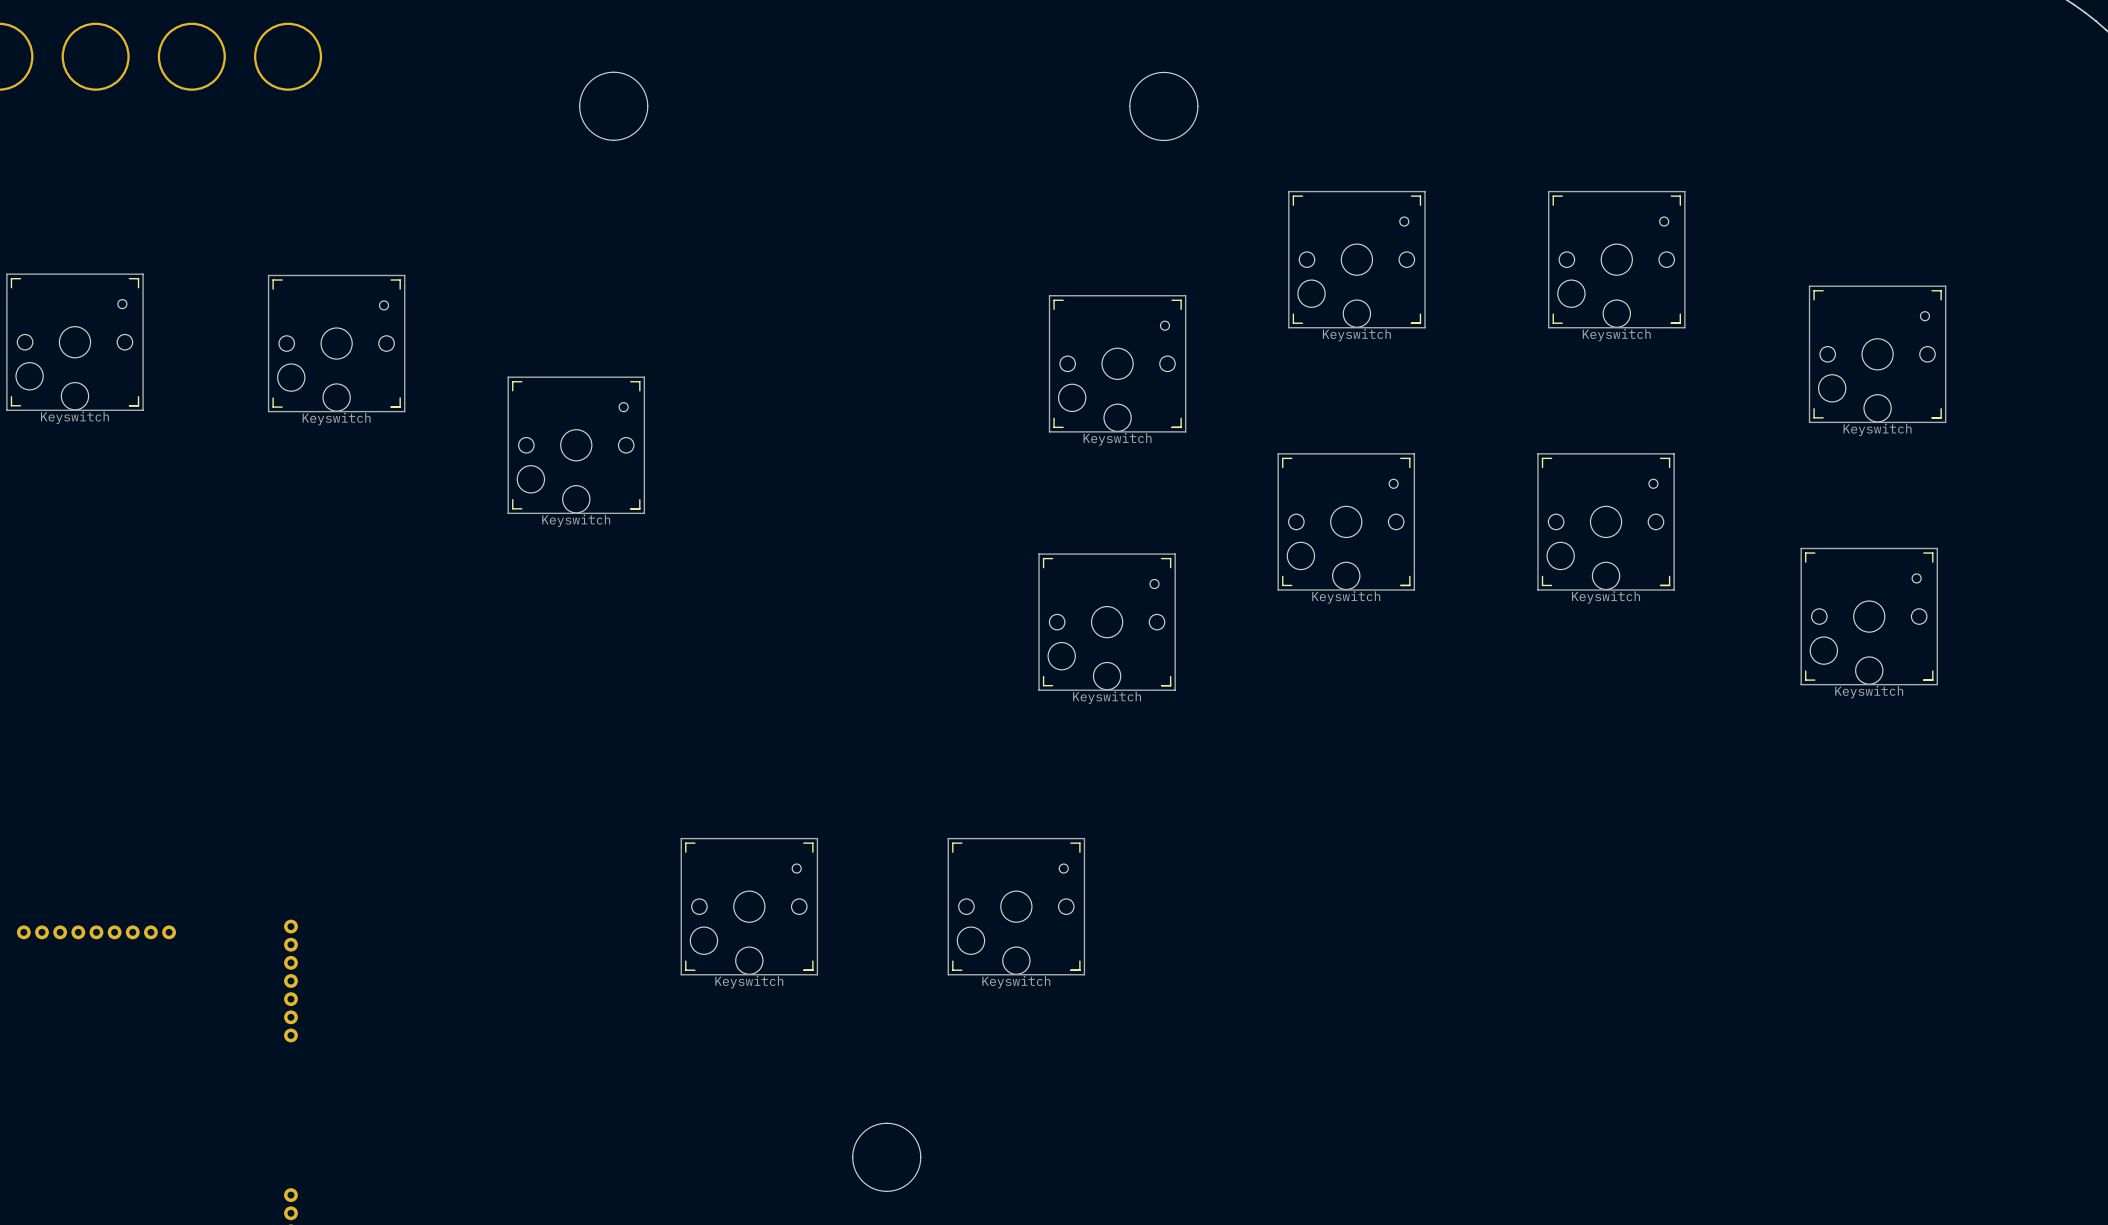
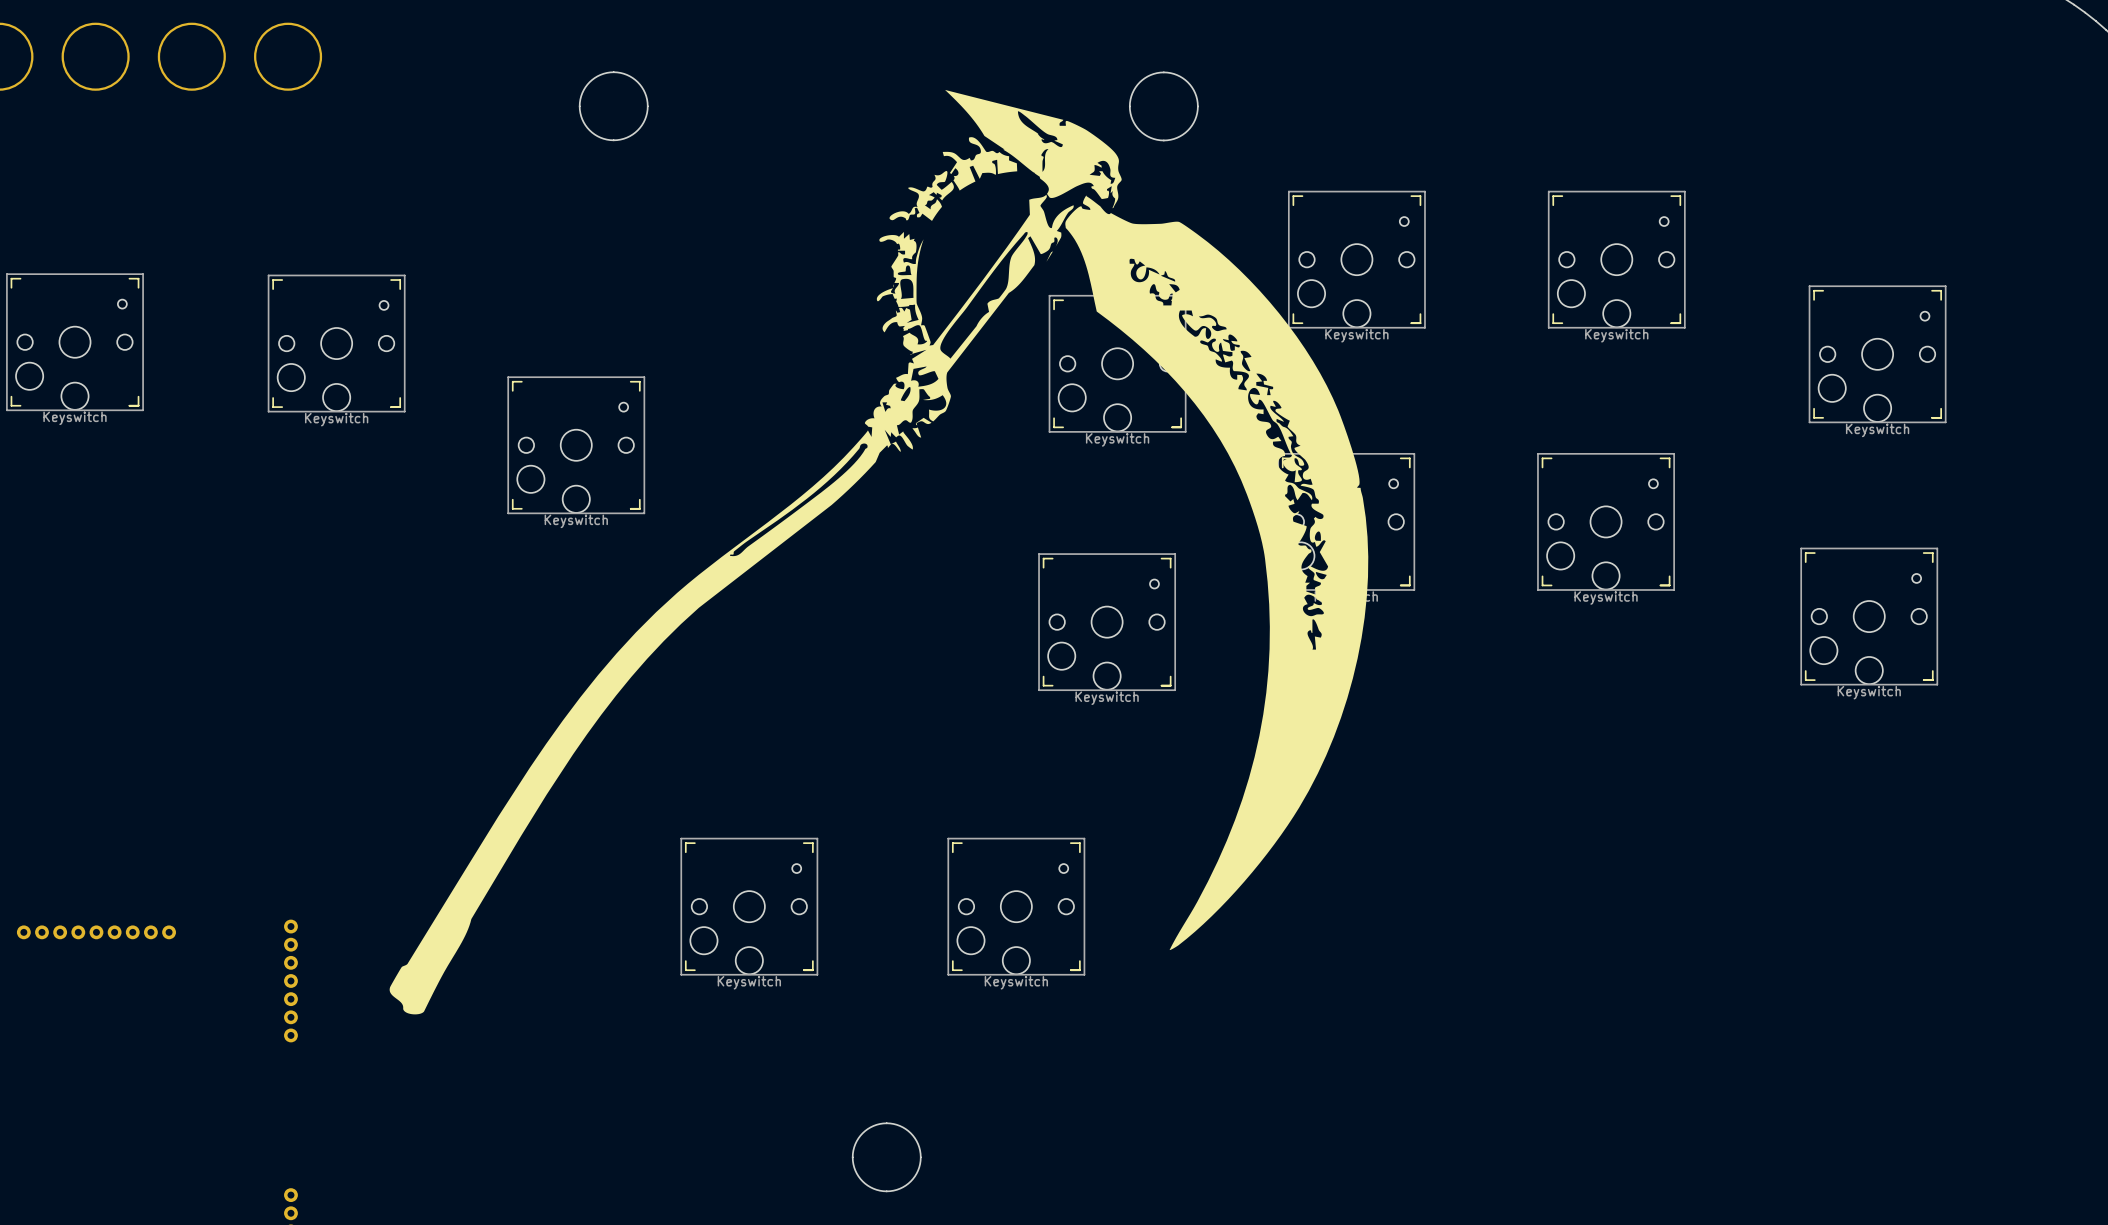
drawing: none -> [389, 89, 1369, 1015]

